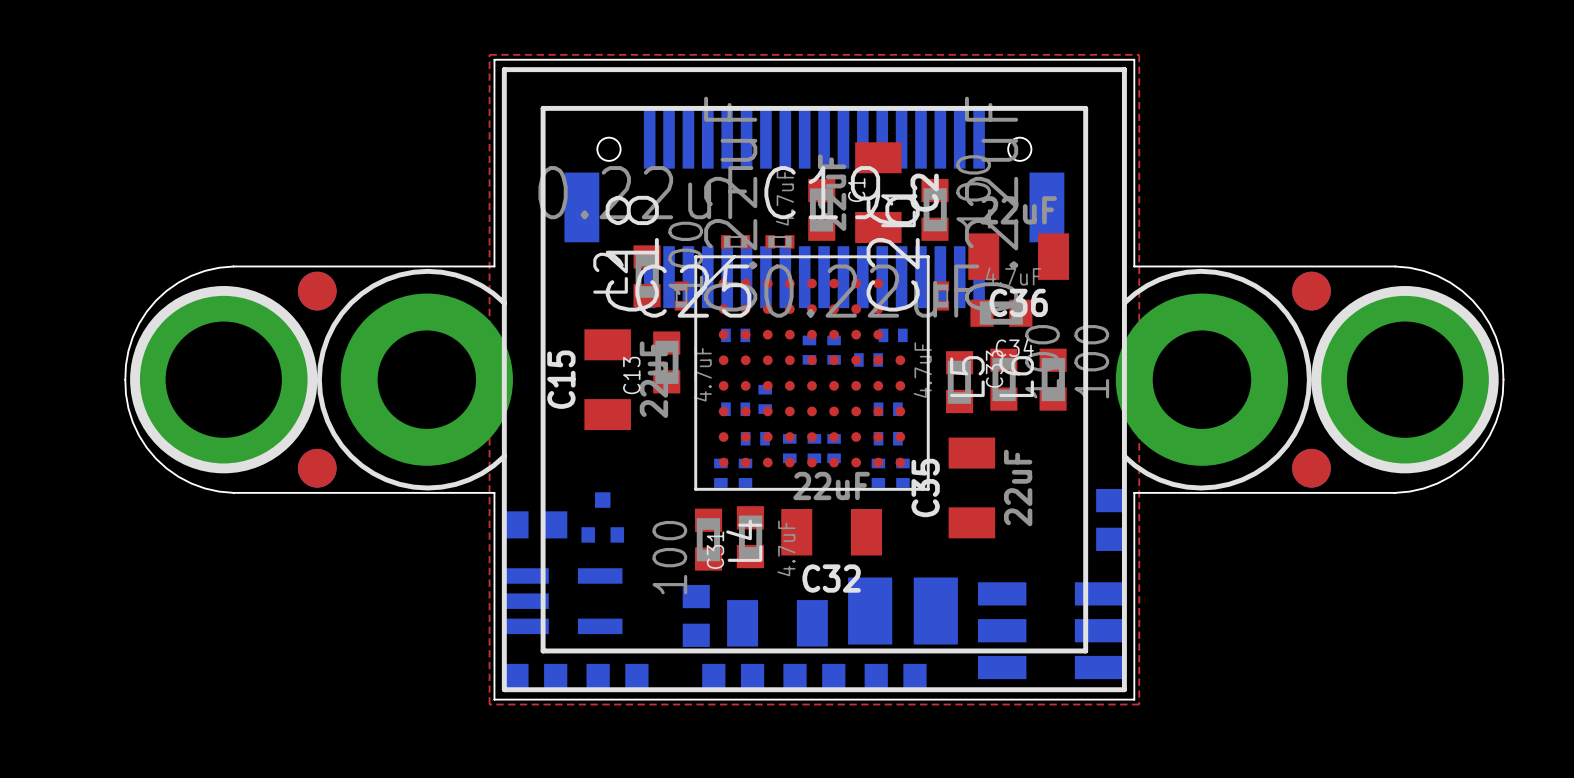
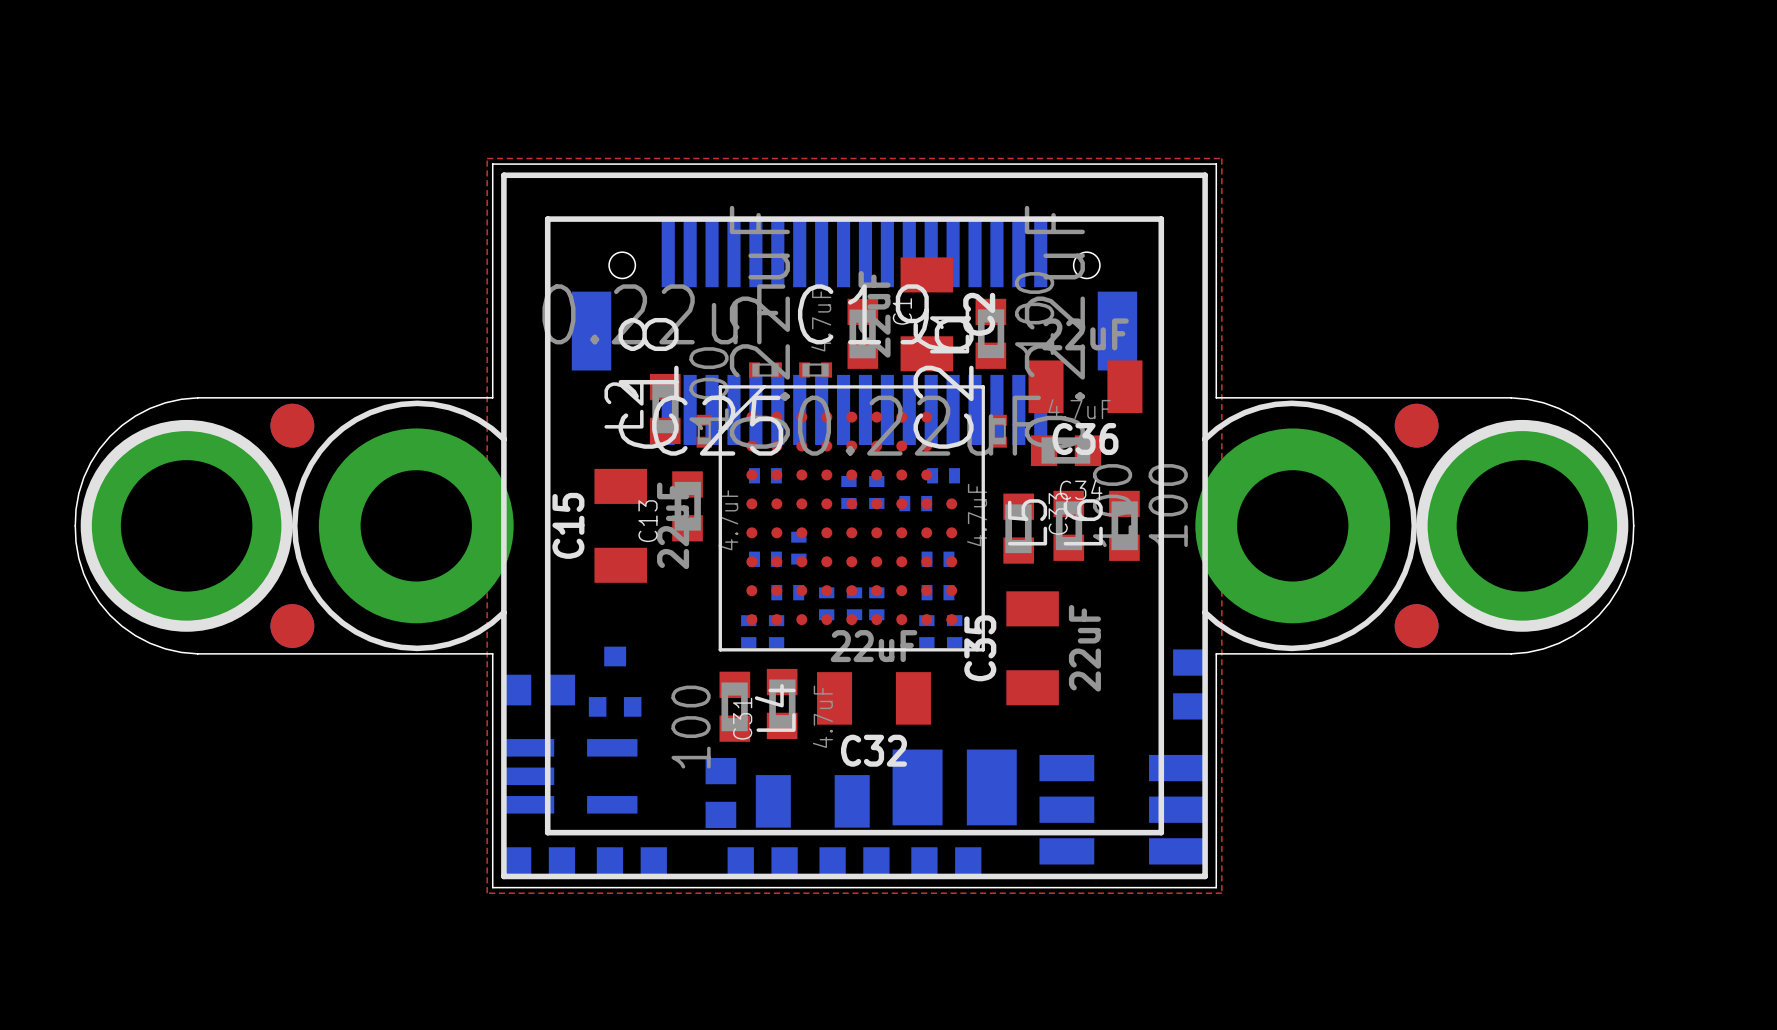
part footprint: [581, 492, 625, 543] -> [588, 646, 642, 717]

